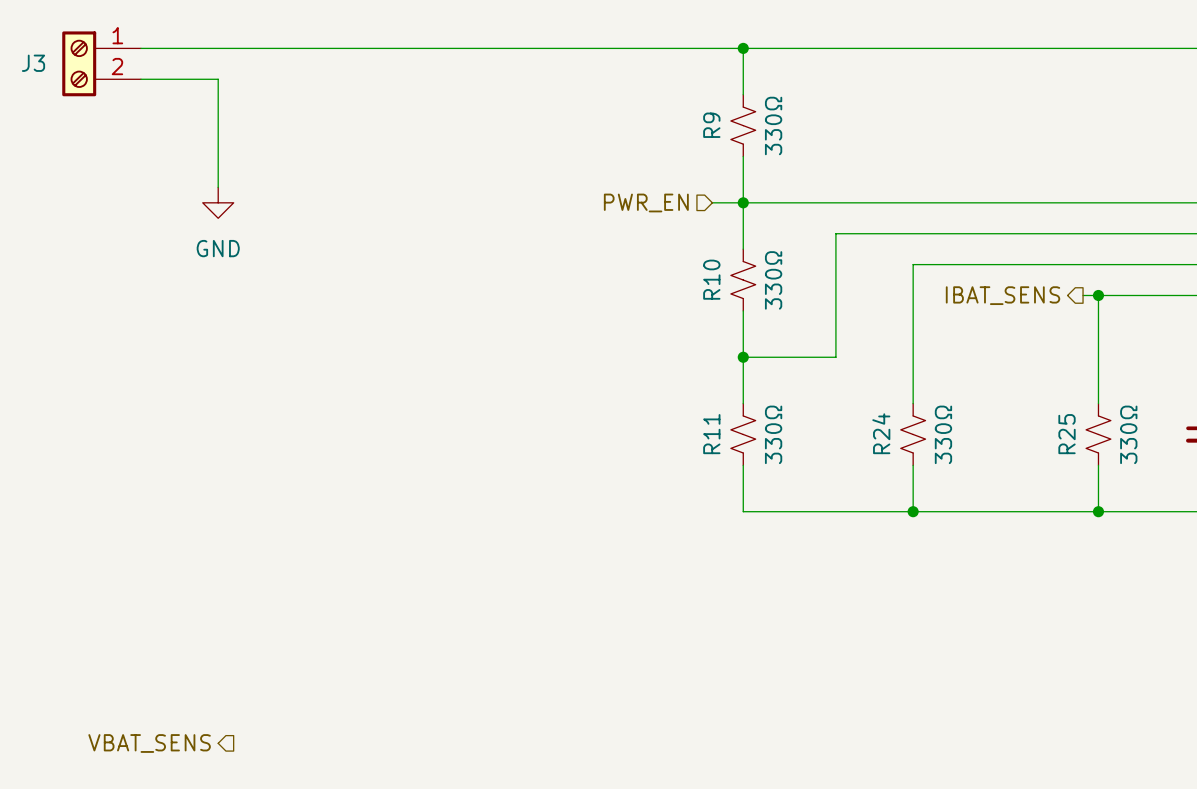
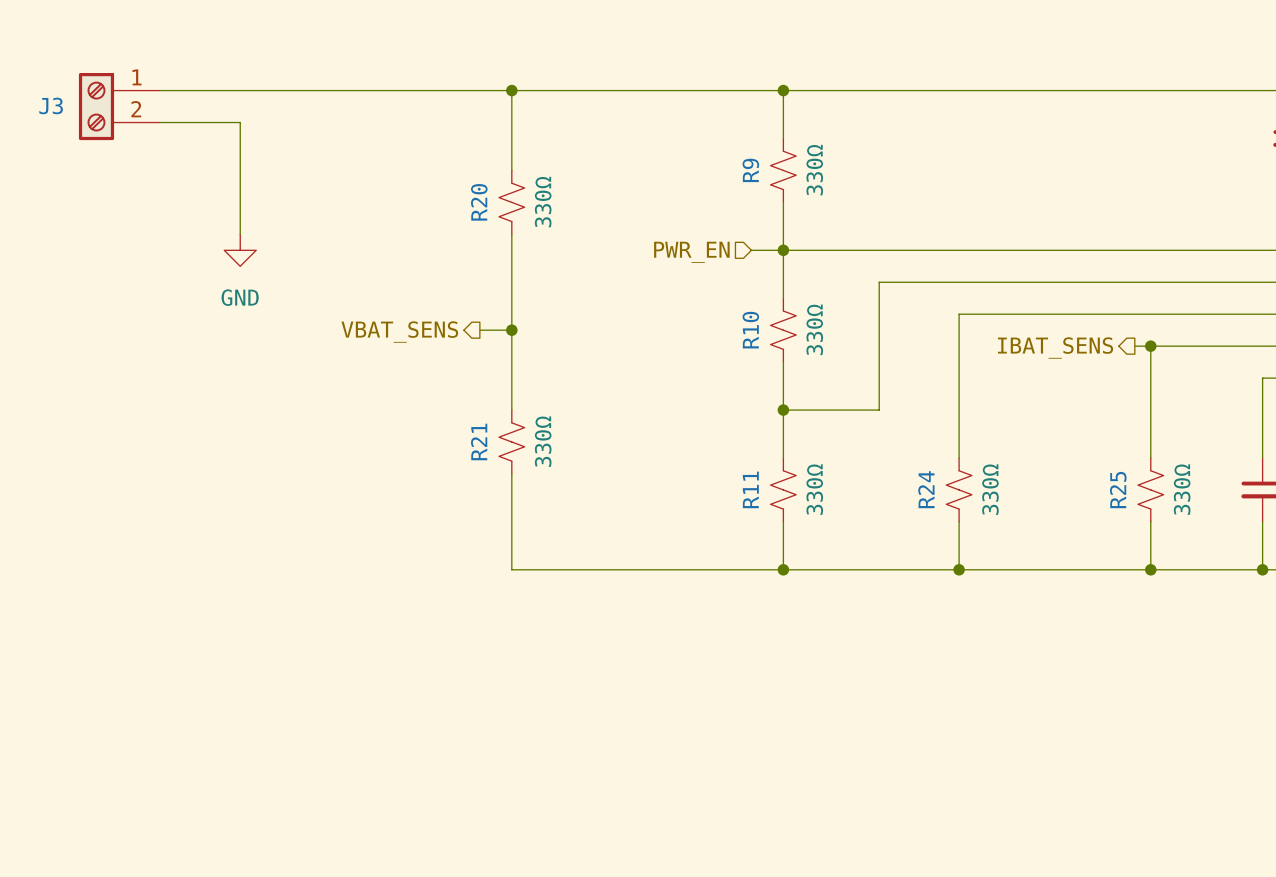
wire: none -> (511, 90) (511, 170)
junction: none -> (511, 90)
R20: none -> 330Ω (511, 202)
wire: none -> (511, 234) (511, 410)
hierarchical label: none -> VBAT_SENS (399, 332)
wire: none -> (479, 330) (511, 330)
junction: none -> (511, 330)
R21: none -> 330Ω (511, 442)
wire: none -> (511, 473) (511, 569) (783, 569)
junction: none -> (783, 569)
hierarchical label: VBAT_SENS (149, 743) -> none

